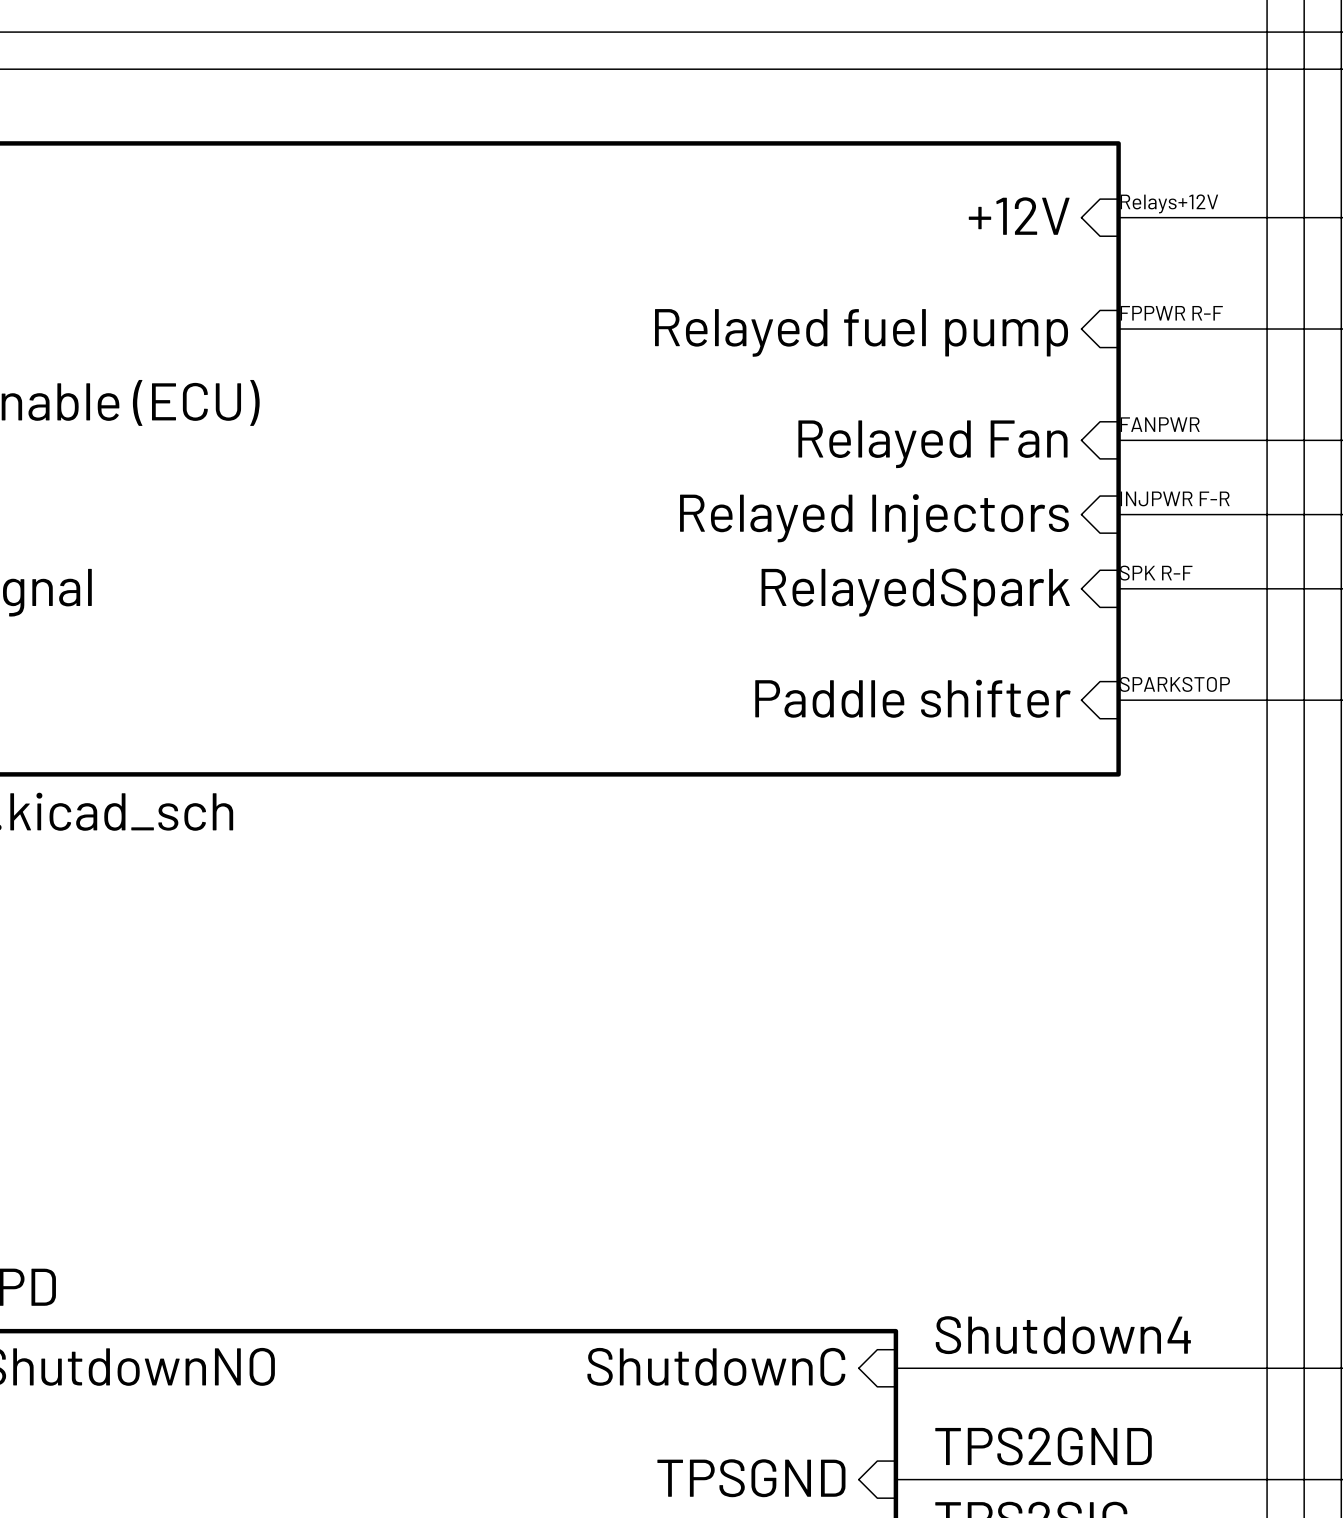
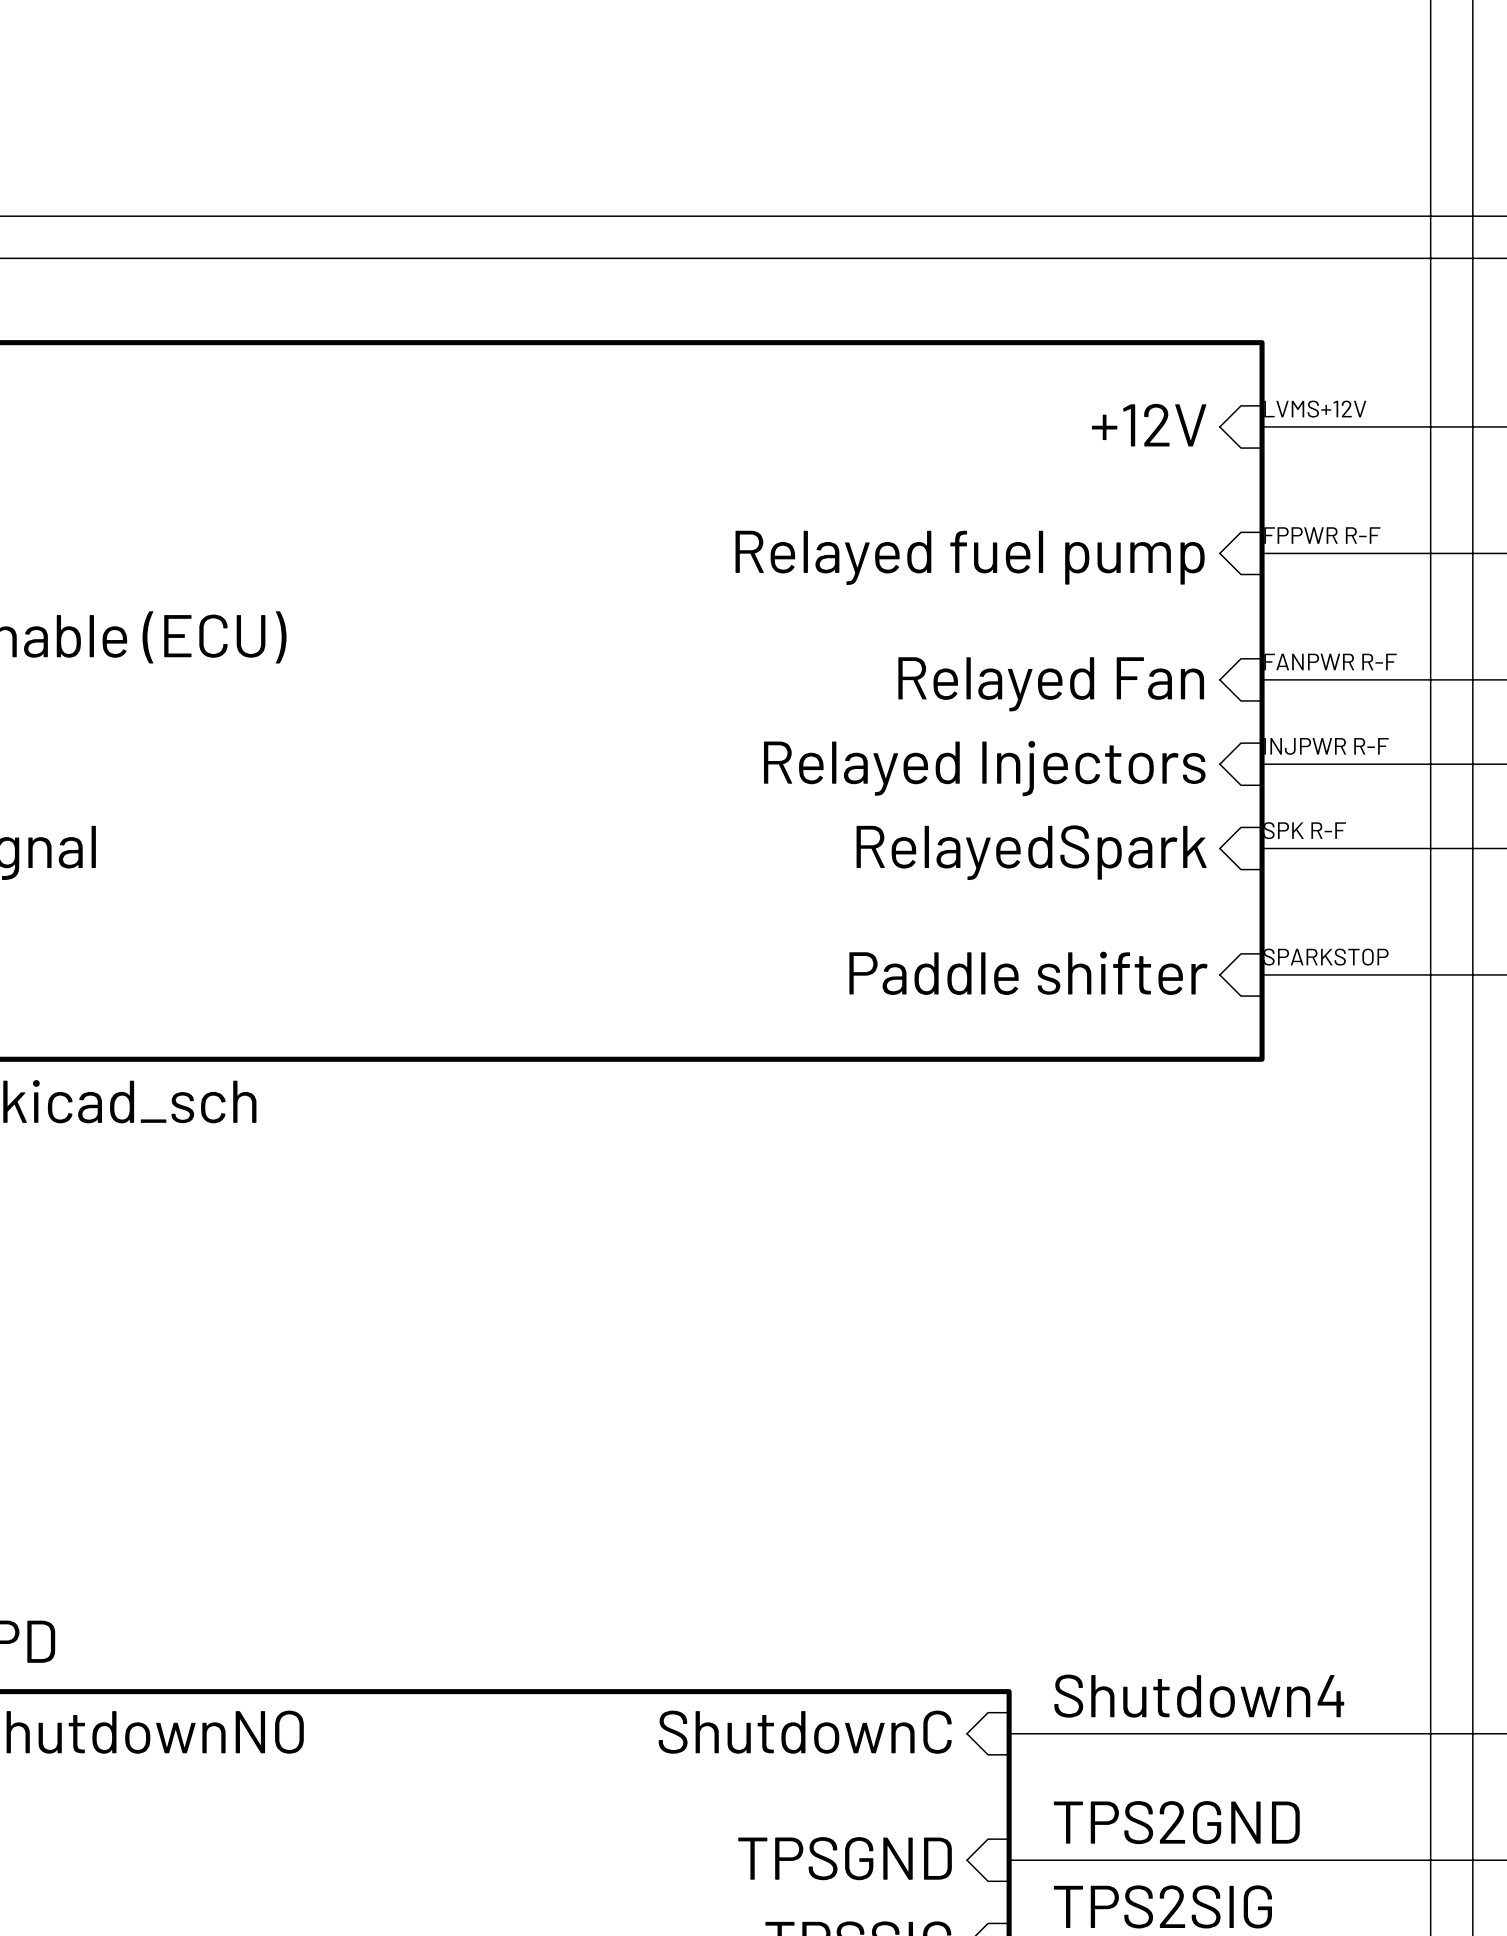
label: Relays+12V (1169, 203) -> LVMS+12V (1315, 409)
label: FANPWR (1160, 424) -> FANPWR R-F (1330, 662)
label: INJPWR F-R (1175, 498) -> INJPWR R-F (1326, 746)

